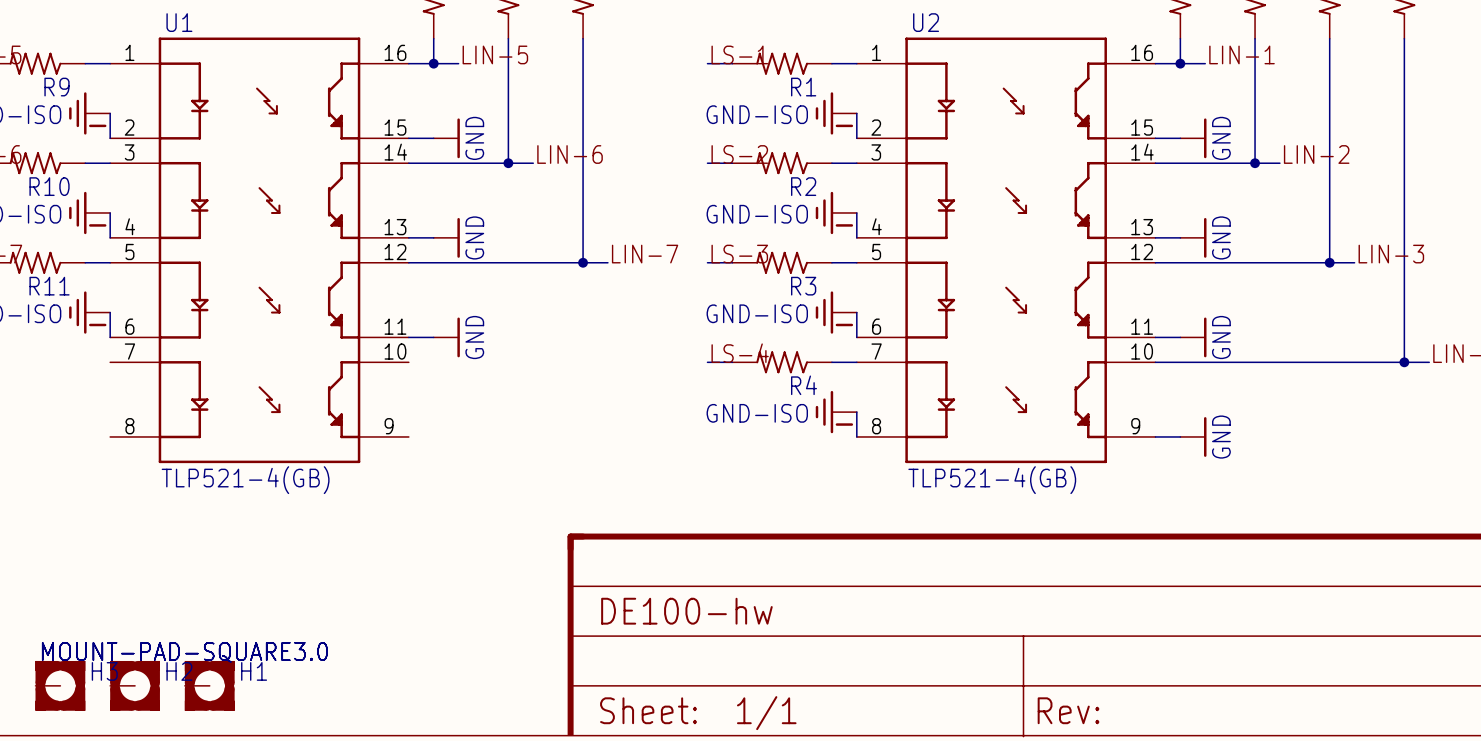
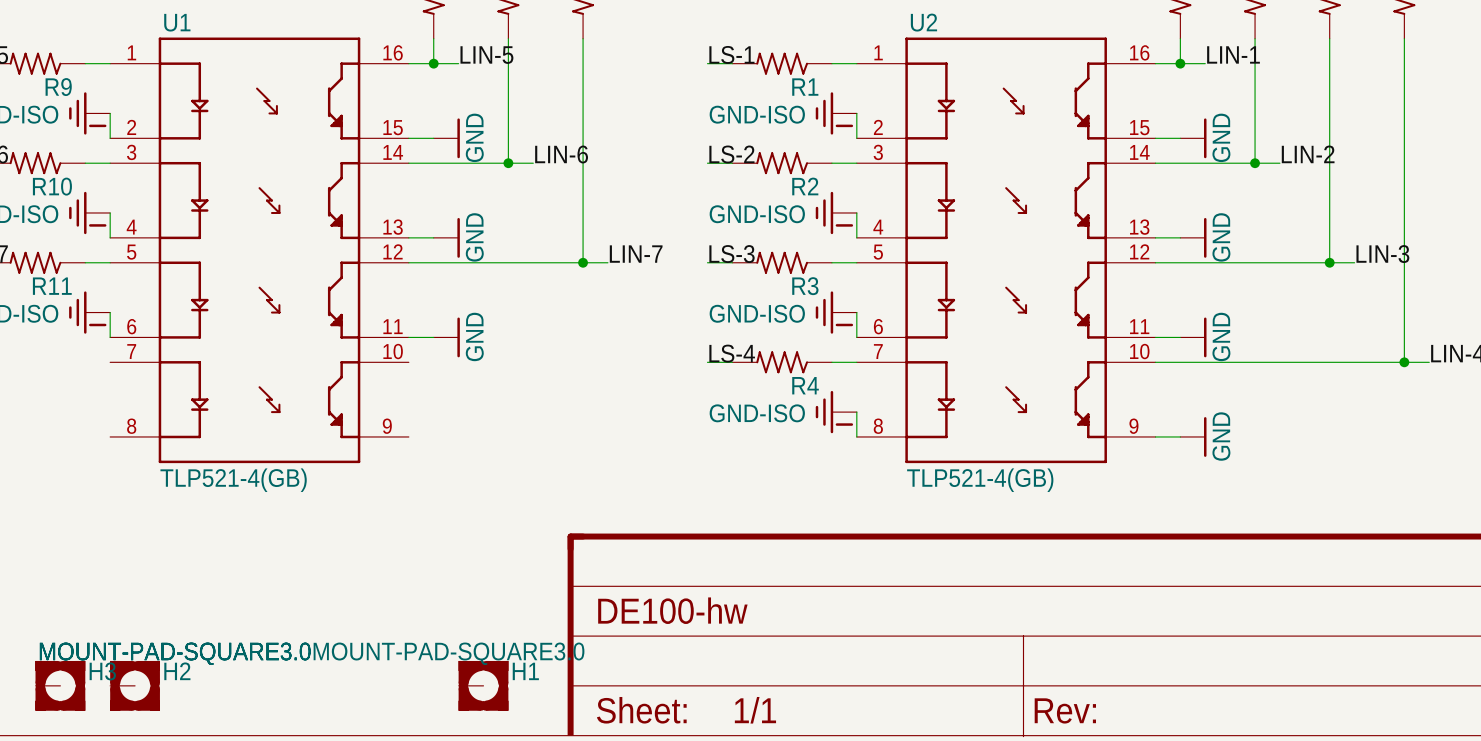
H1 position: (209, 685) -> (483, 685)

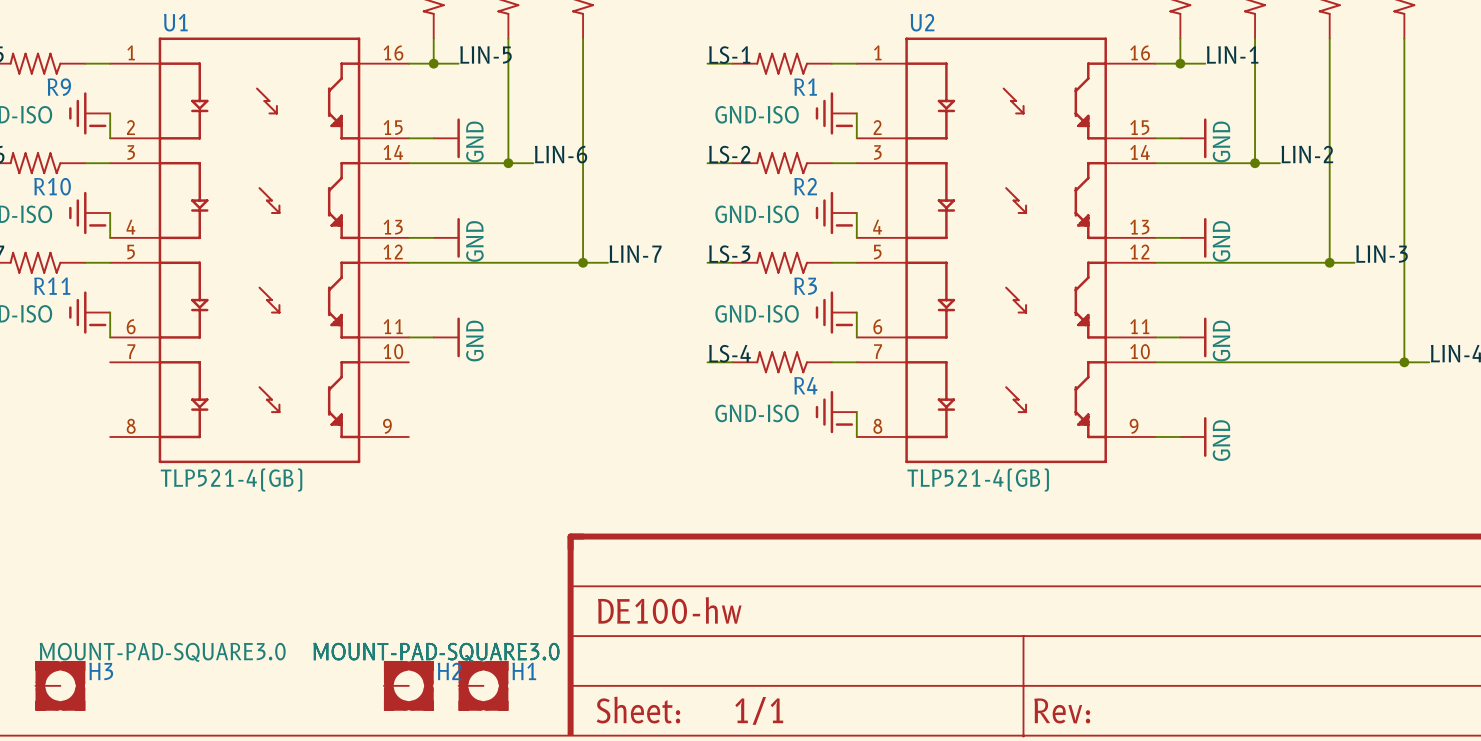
H2 position: (135, 685) -> (408, 685)

